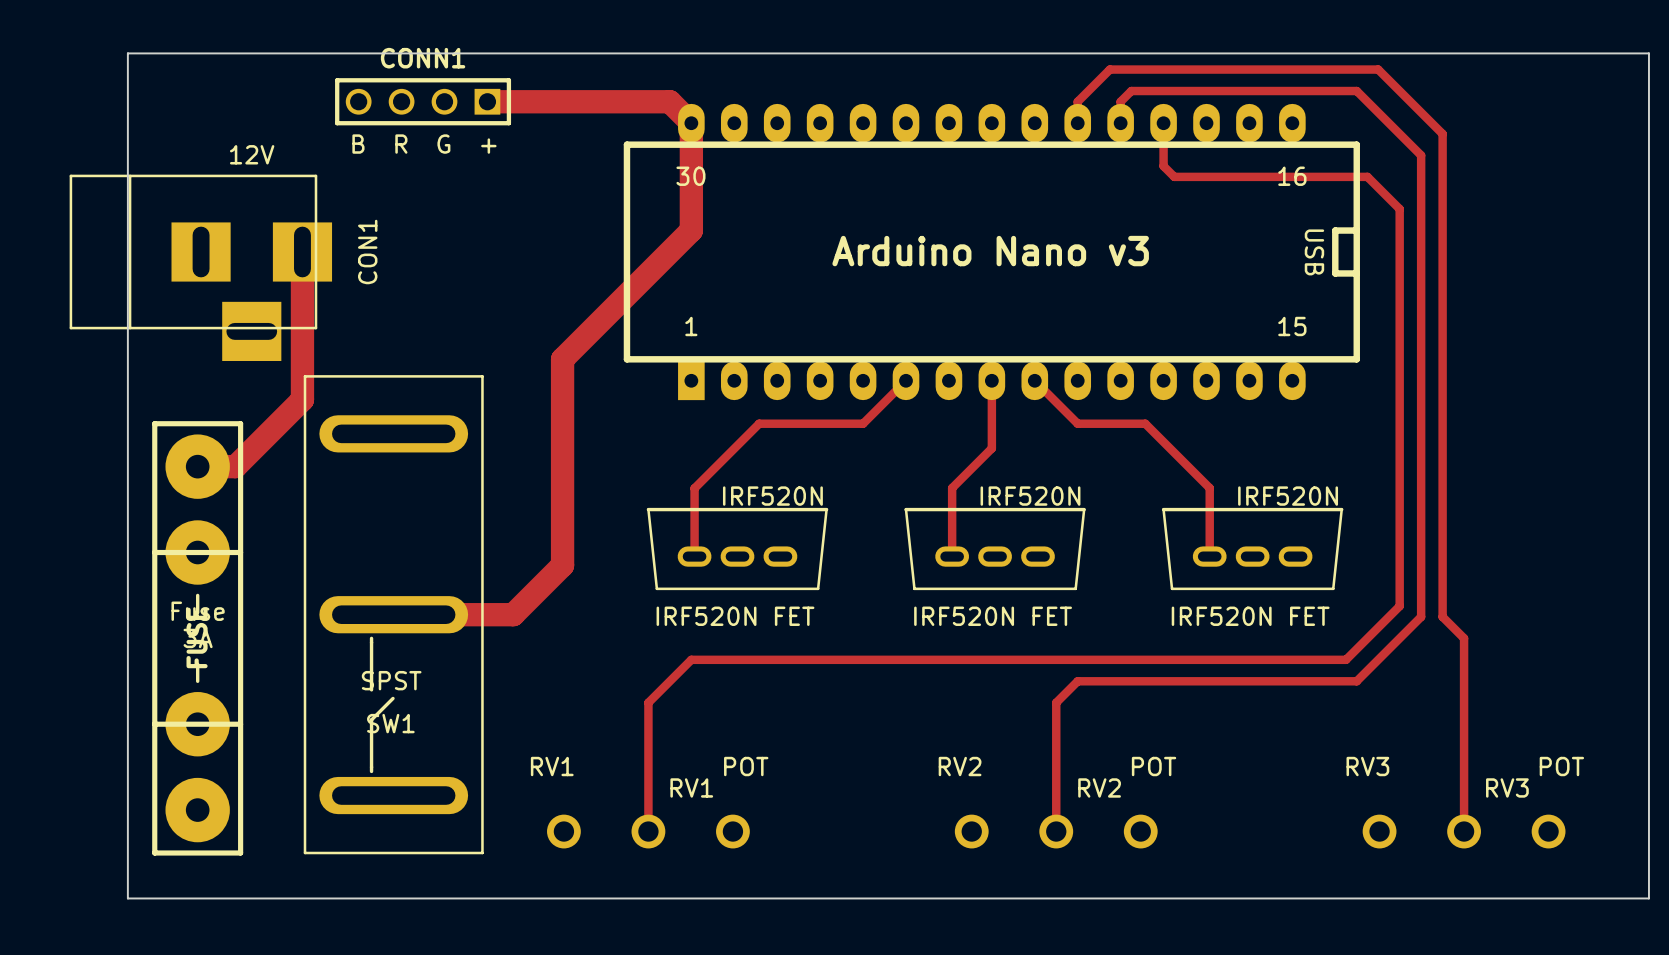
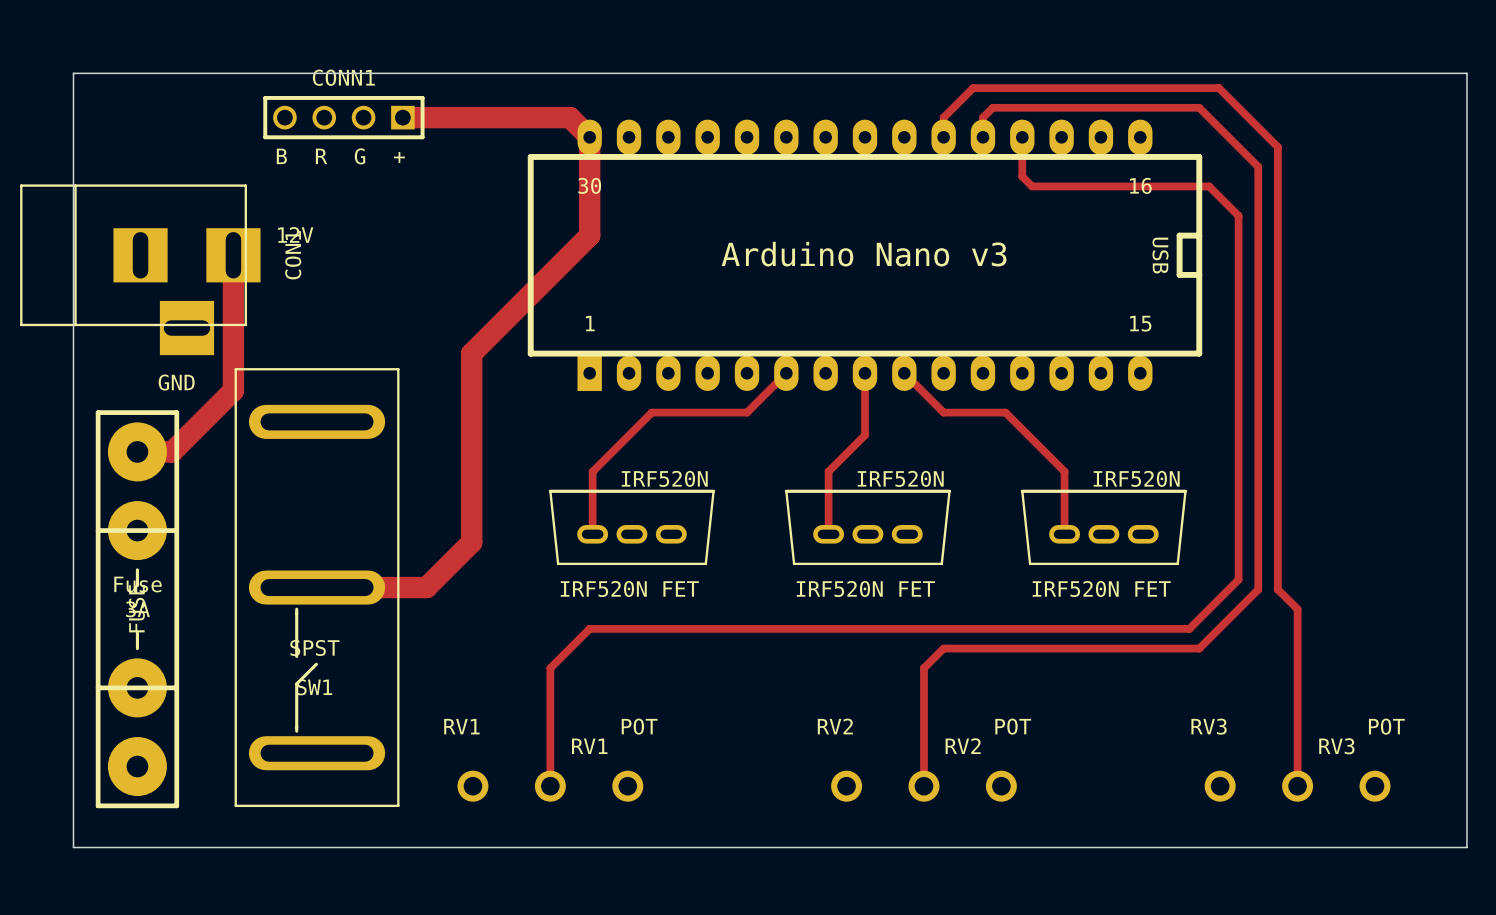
text position: 12V (252, 154) -> 12V (295, 234)
text: none -> GND (176, 382)

